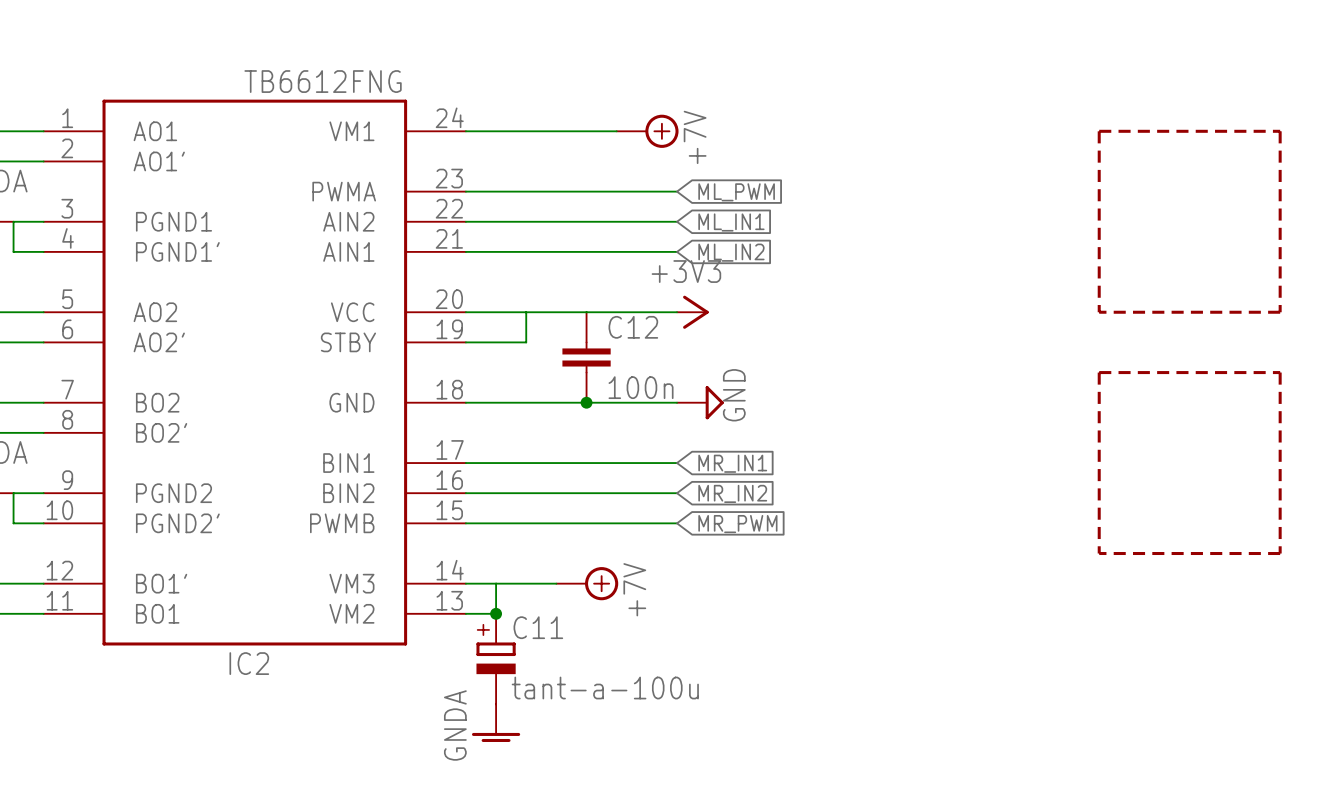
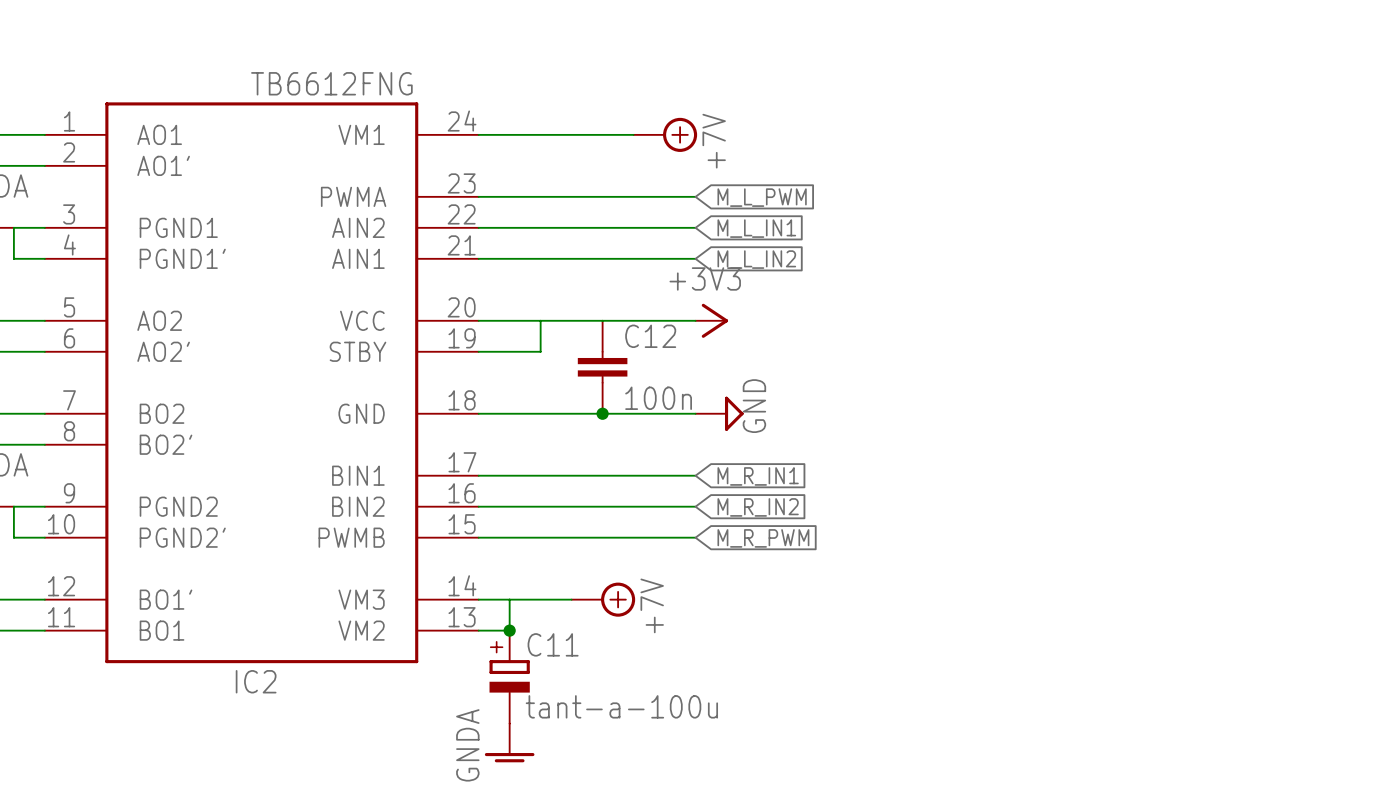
global label: ML_PWM (736, 192) -> M_L_PWM (762, 197)
part: (1189, 221) -> none
global label: ML_IN1 (731, 222) -> M_L_IN1 (756, 228)
global label: ML_IN2 (731, 252) -> M_L_IN2 (756, 259)
global label: MR_IN1 (732, 463) -> M_R_IN1 (758, 476)
part: (1189, 463) -> none
global label: MR_IN2 (732, 493) -> M_R_IN2 (758, 507)
global label: MR_PWM (737, 524) -> M_R_PWM (763, 538)

